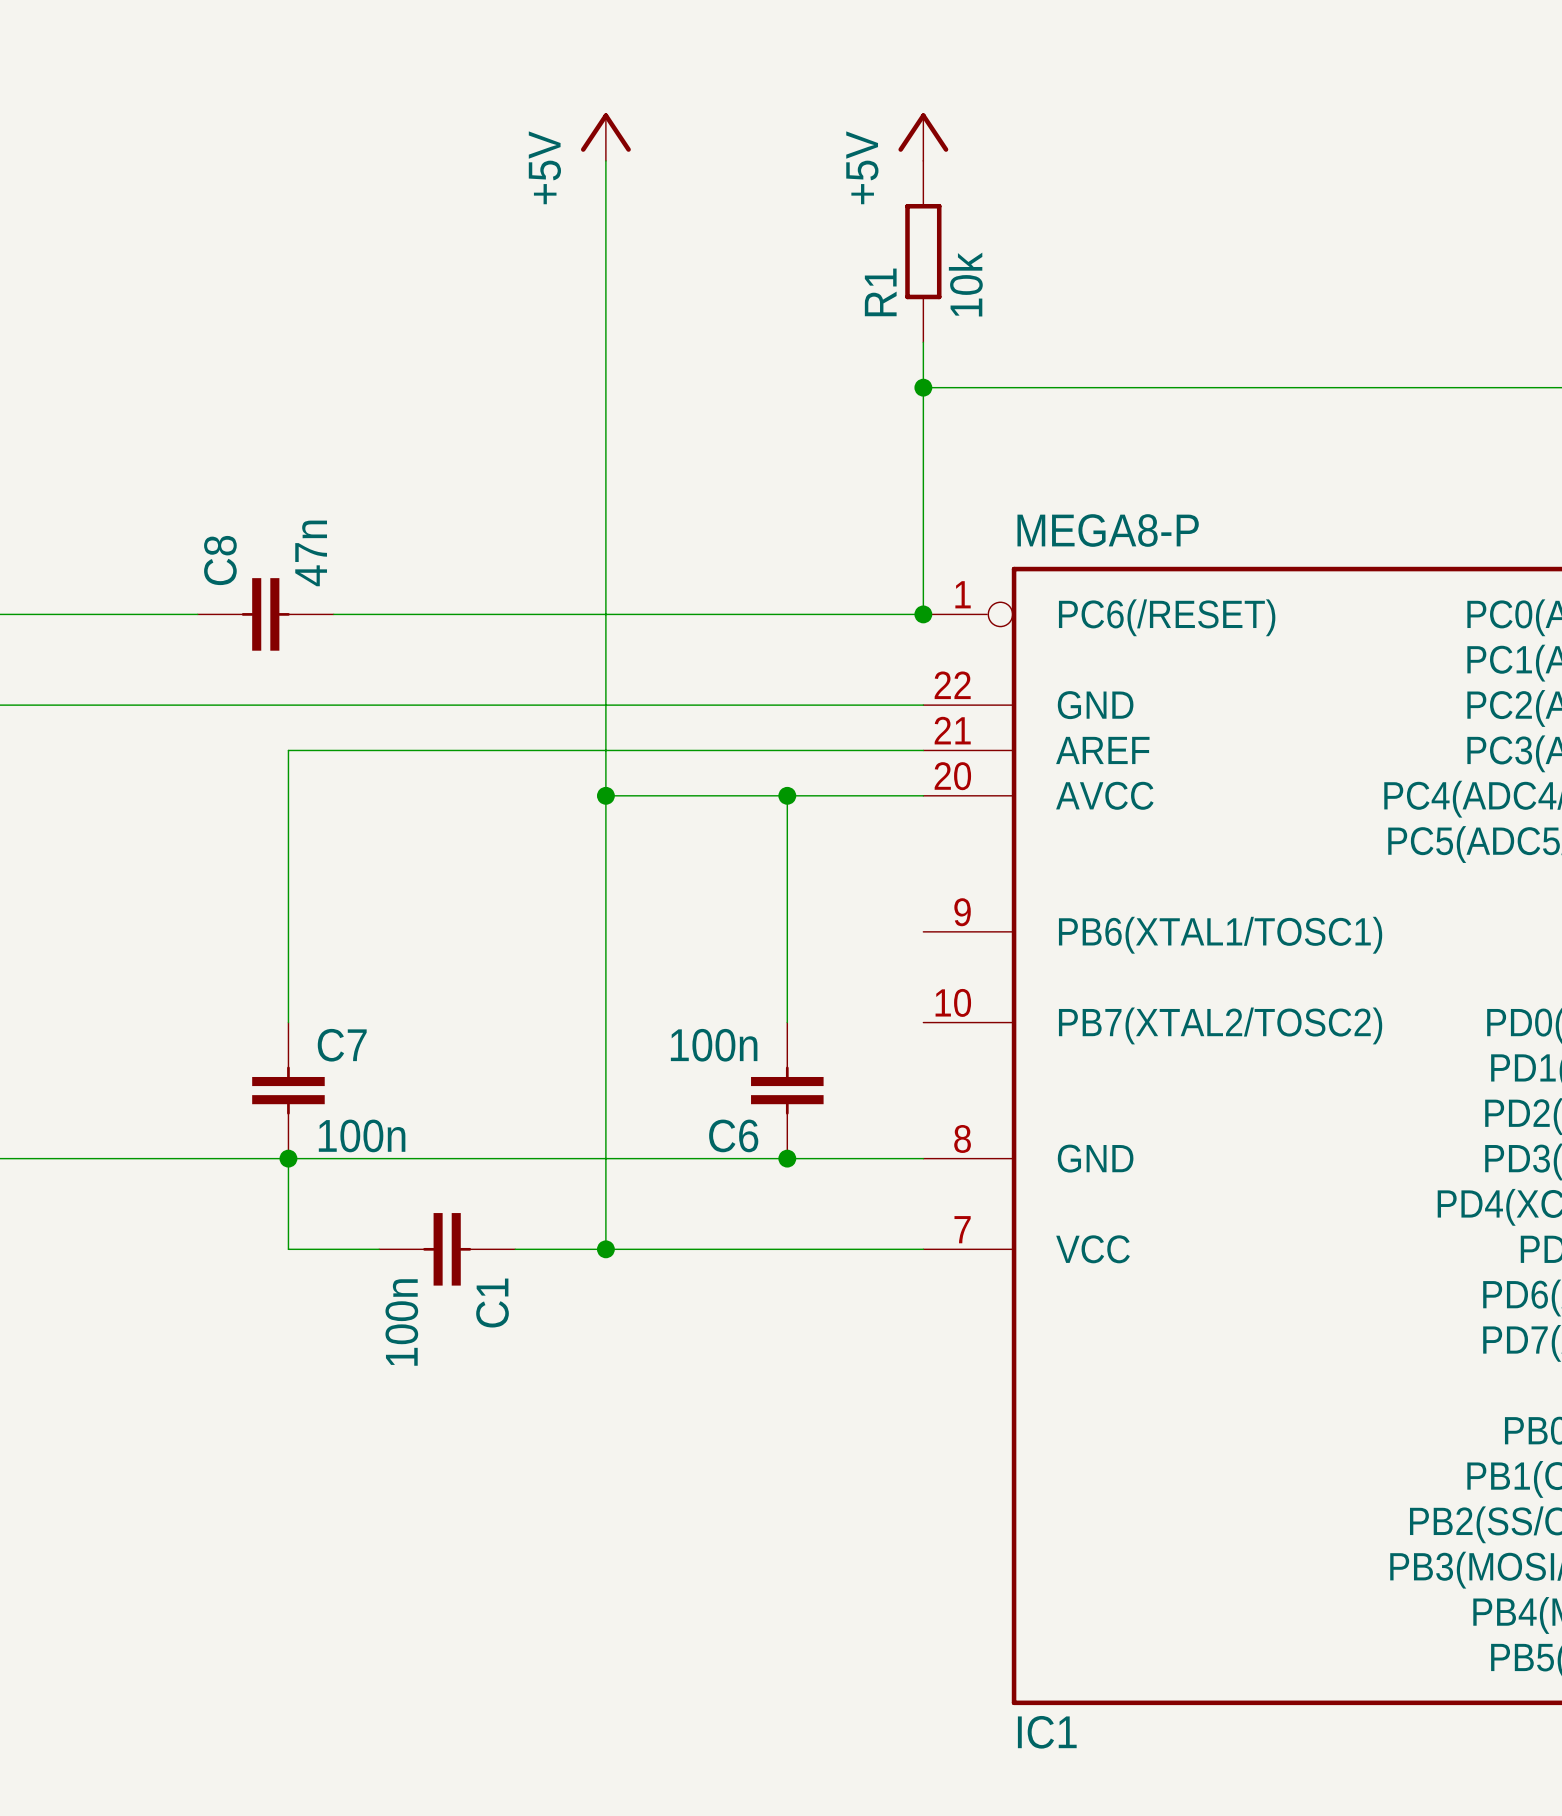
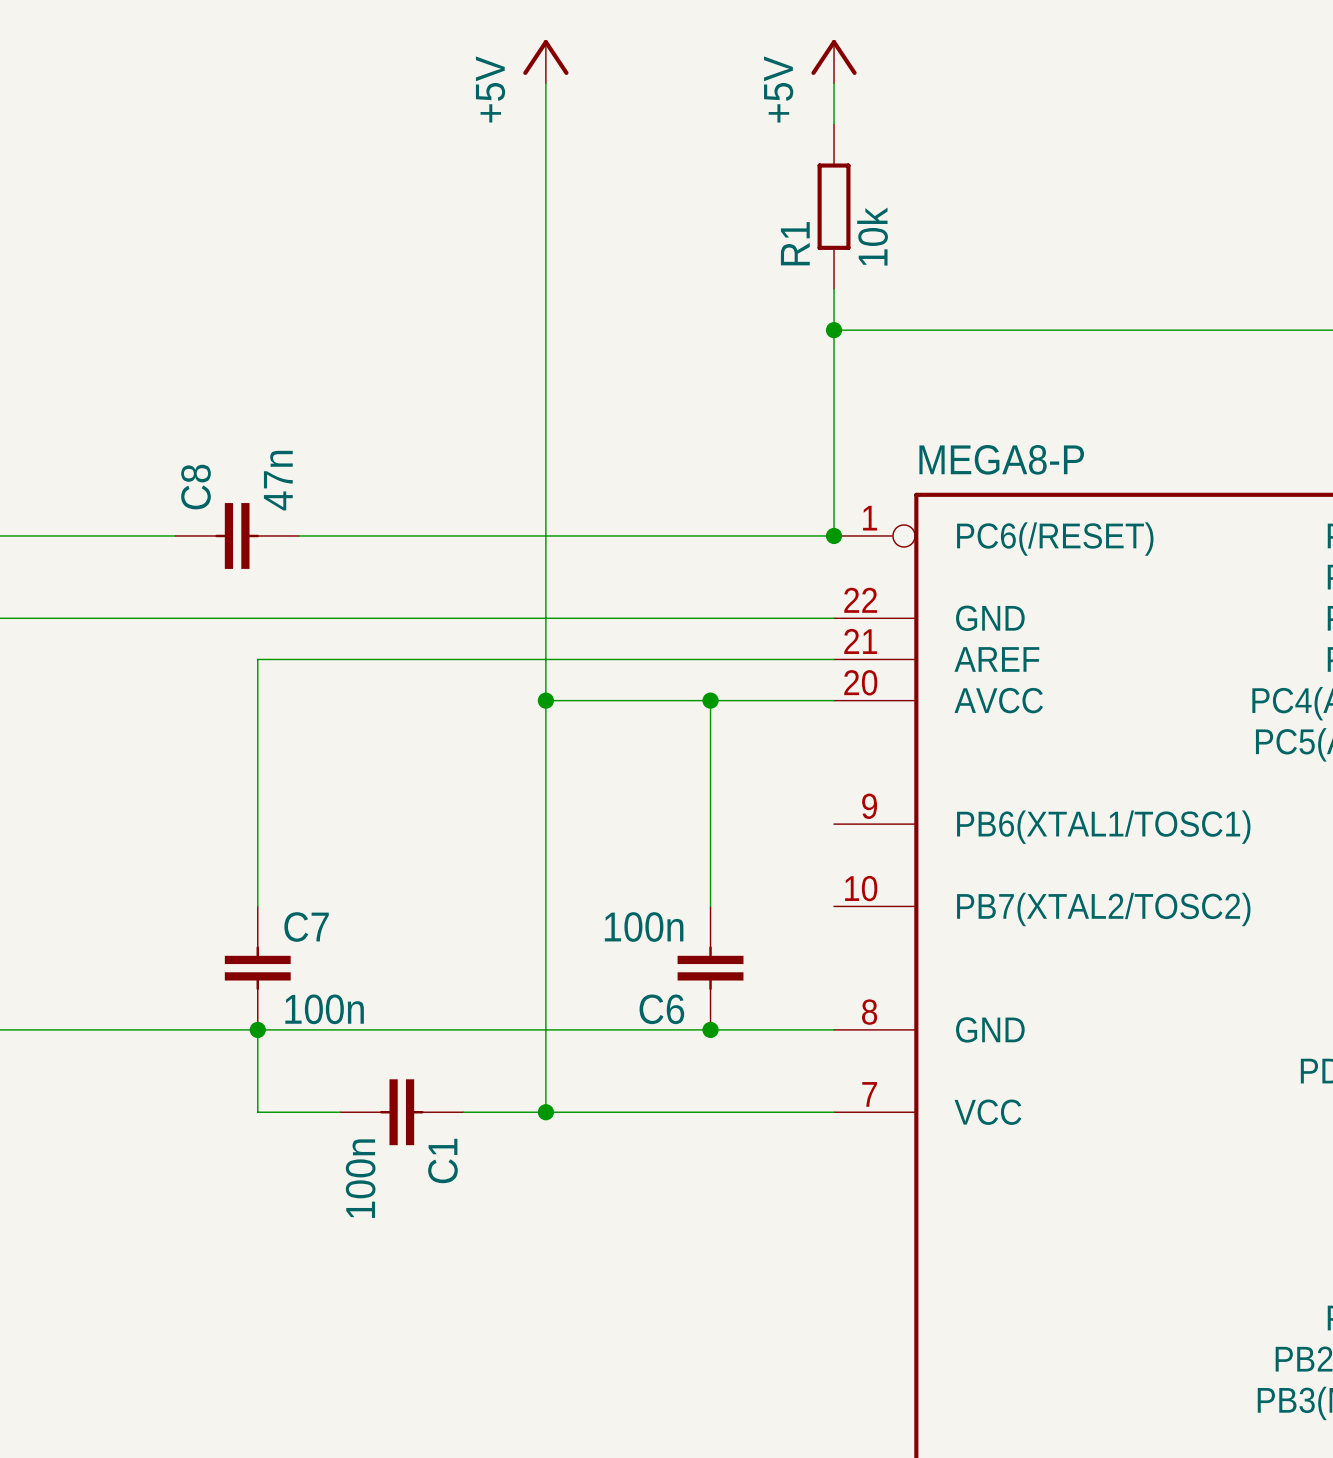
power symbol position: +5V (605, 137) -> +5V (545, 61)
power symbol position: +5V (923, 137) -> +5V (834, 61)

